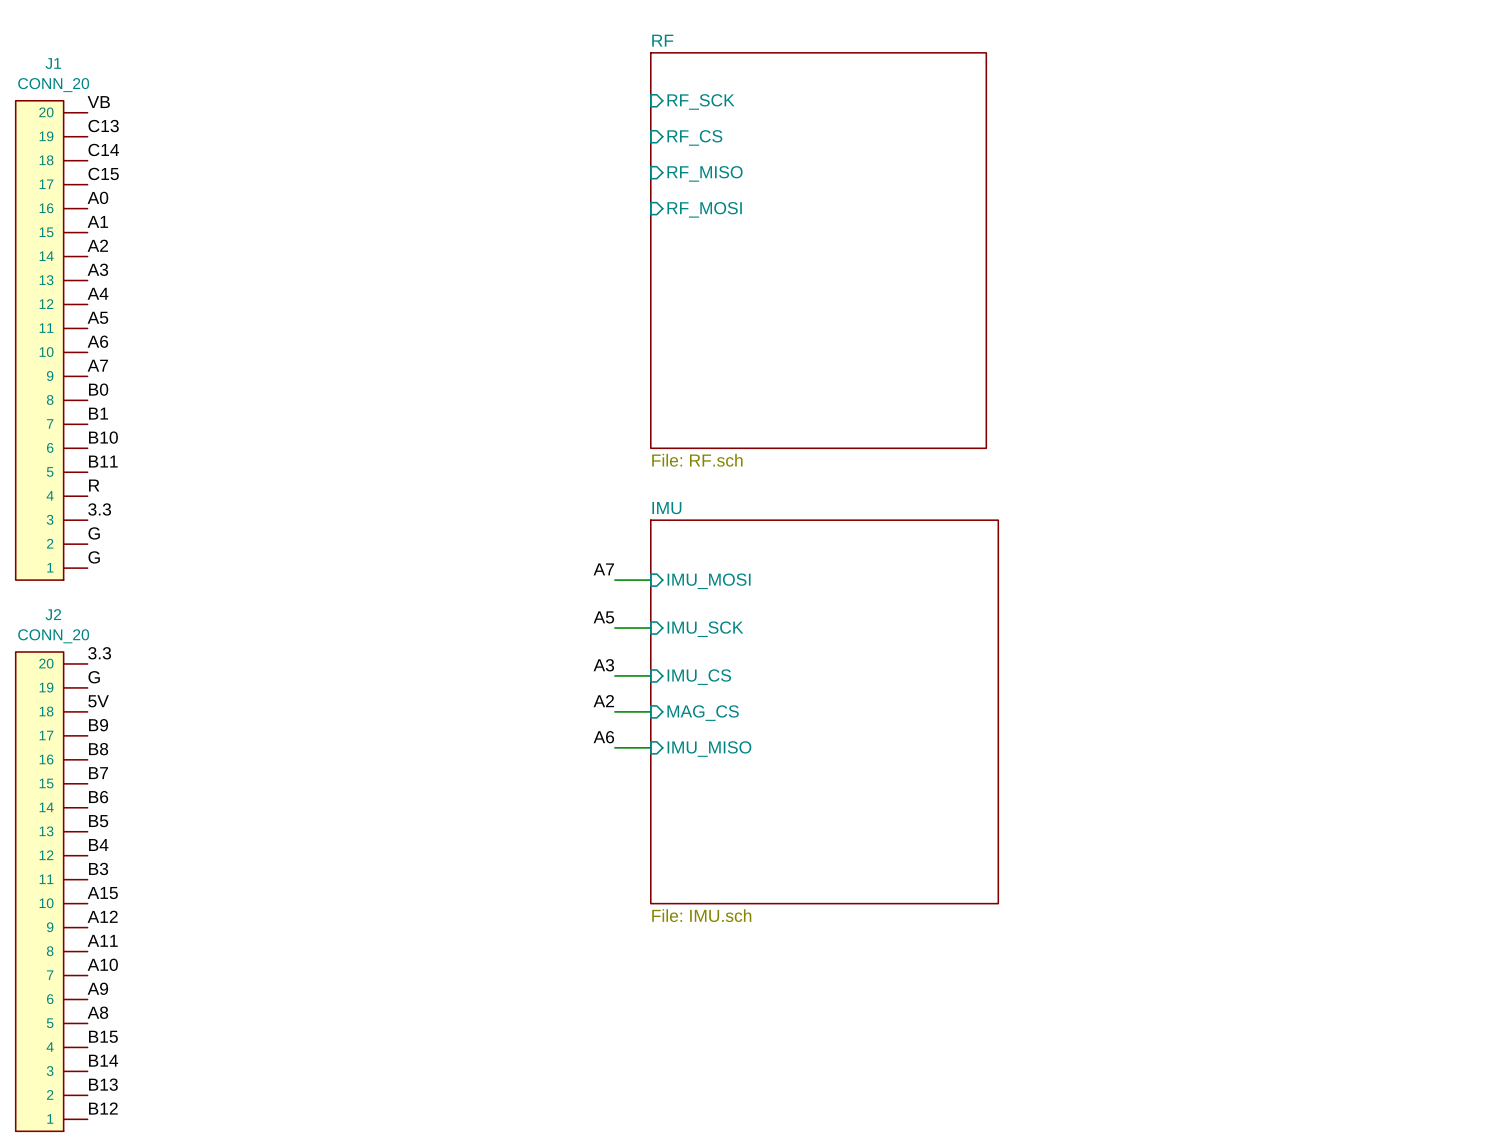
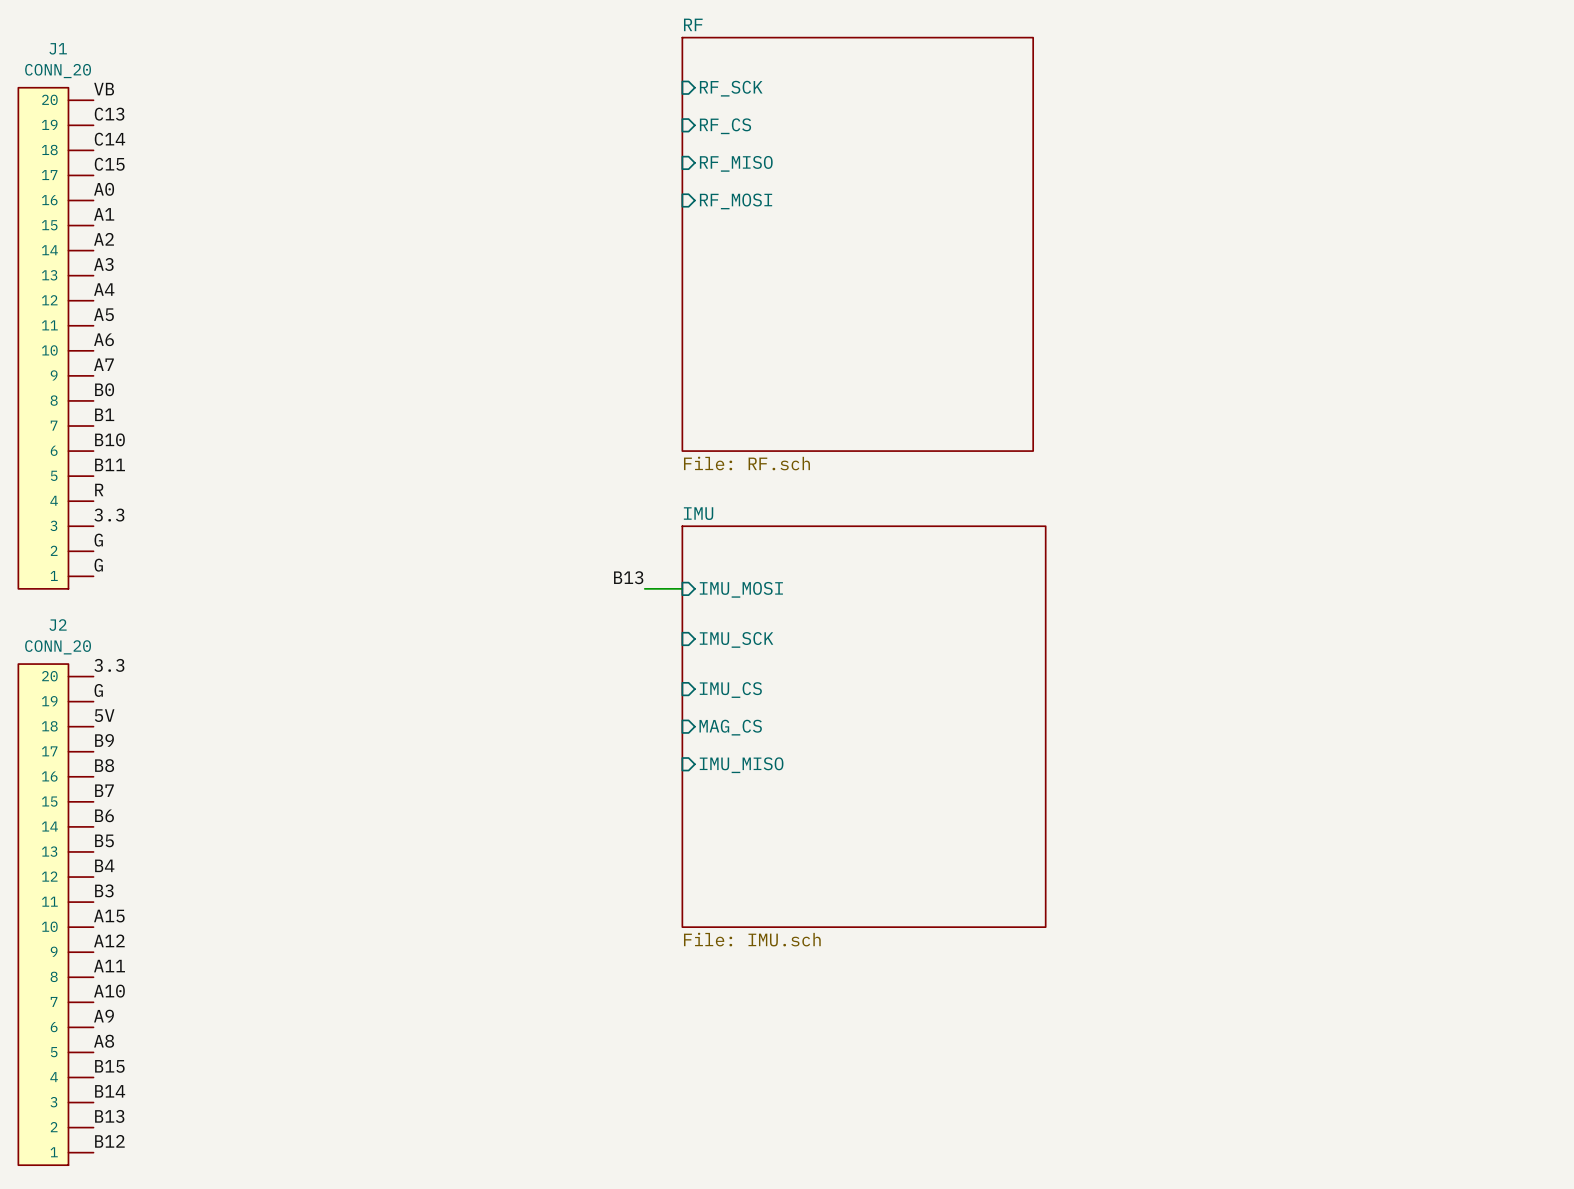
label: A7 (603, 569) -> B13 (628, 577)
label: A5 (603, 617) -> none
wire: (614, 628) (650, 628) -> none
label: A3 (603, 665) -> none
wire: (614, 675) (650, 675) -> none
label: A2 (603, 701) -> none
wire: (614, 711) (650, 711) -> none
label: A6 (603, 737) -> none
wire: (614, 747) (650, 747) -> none

